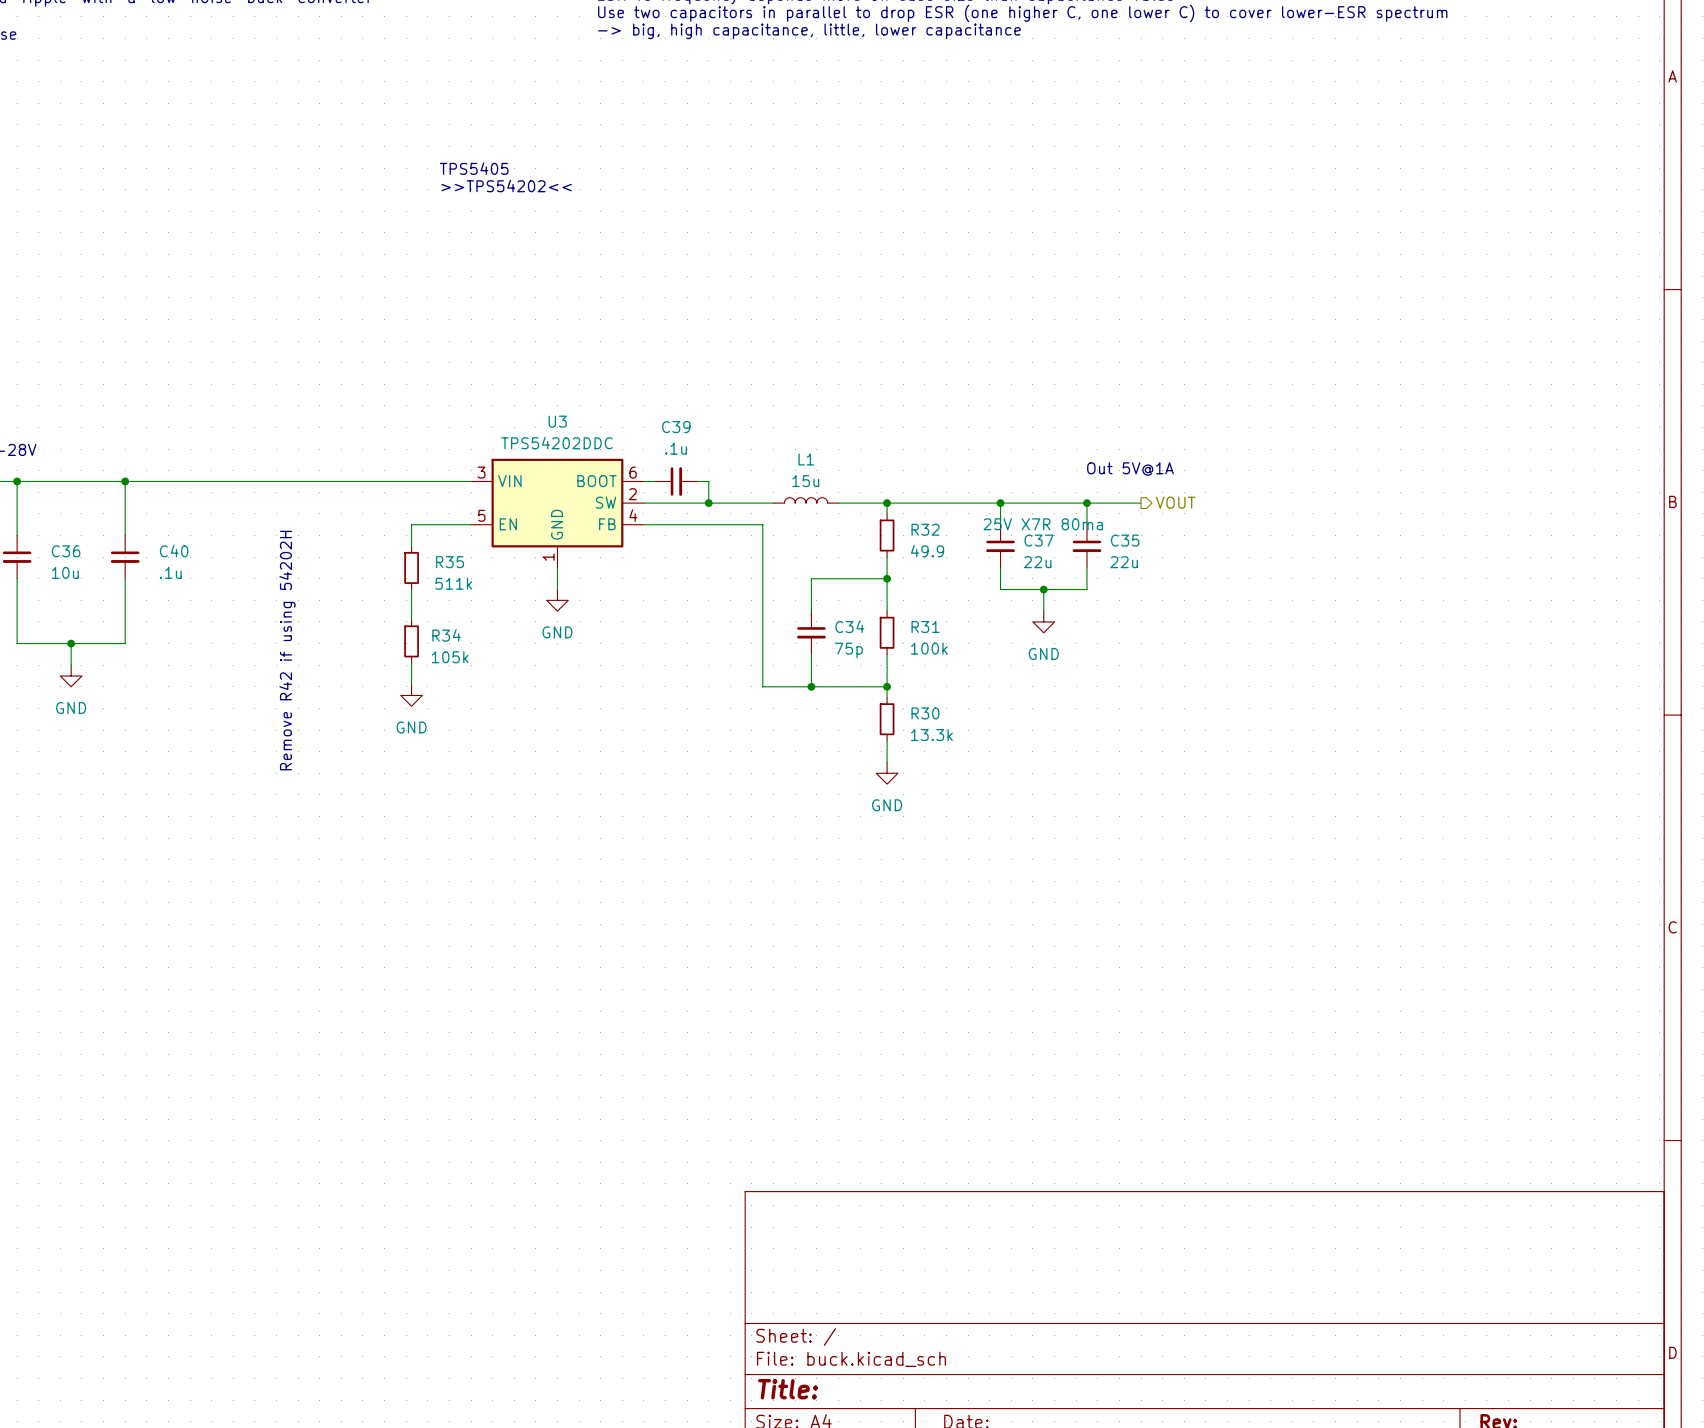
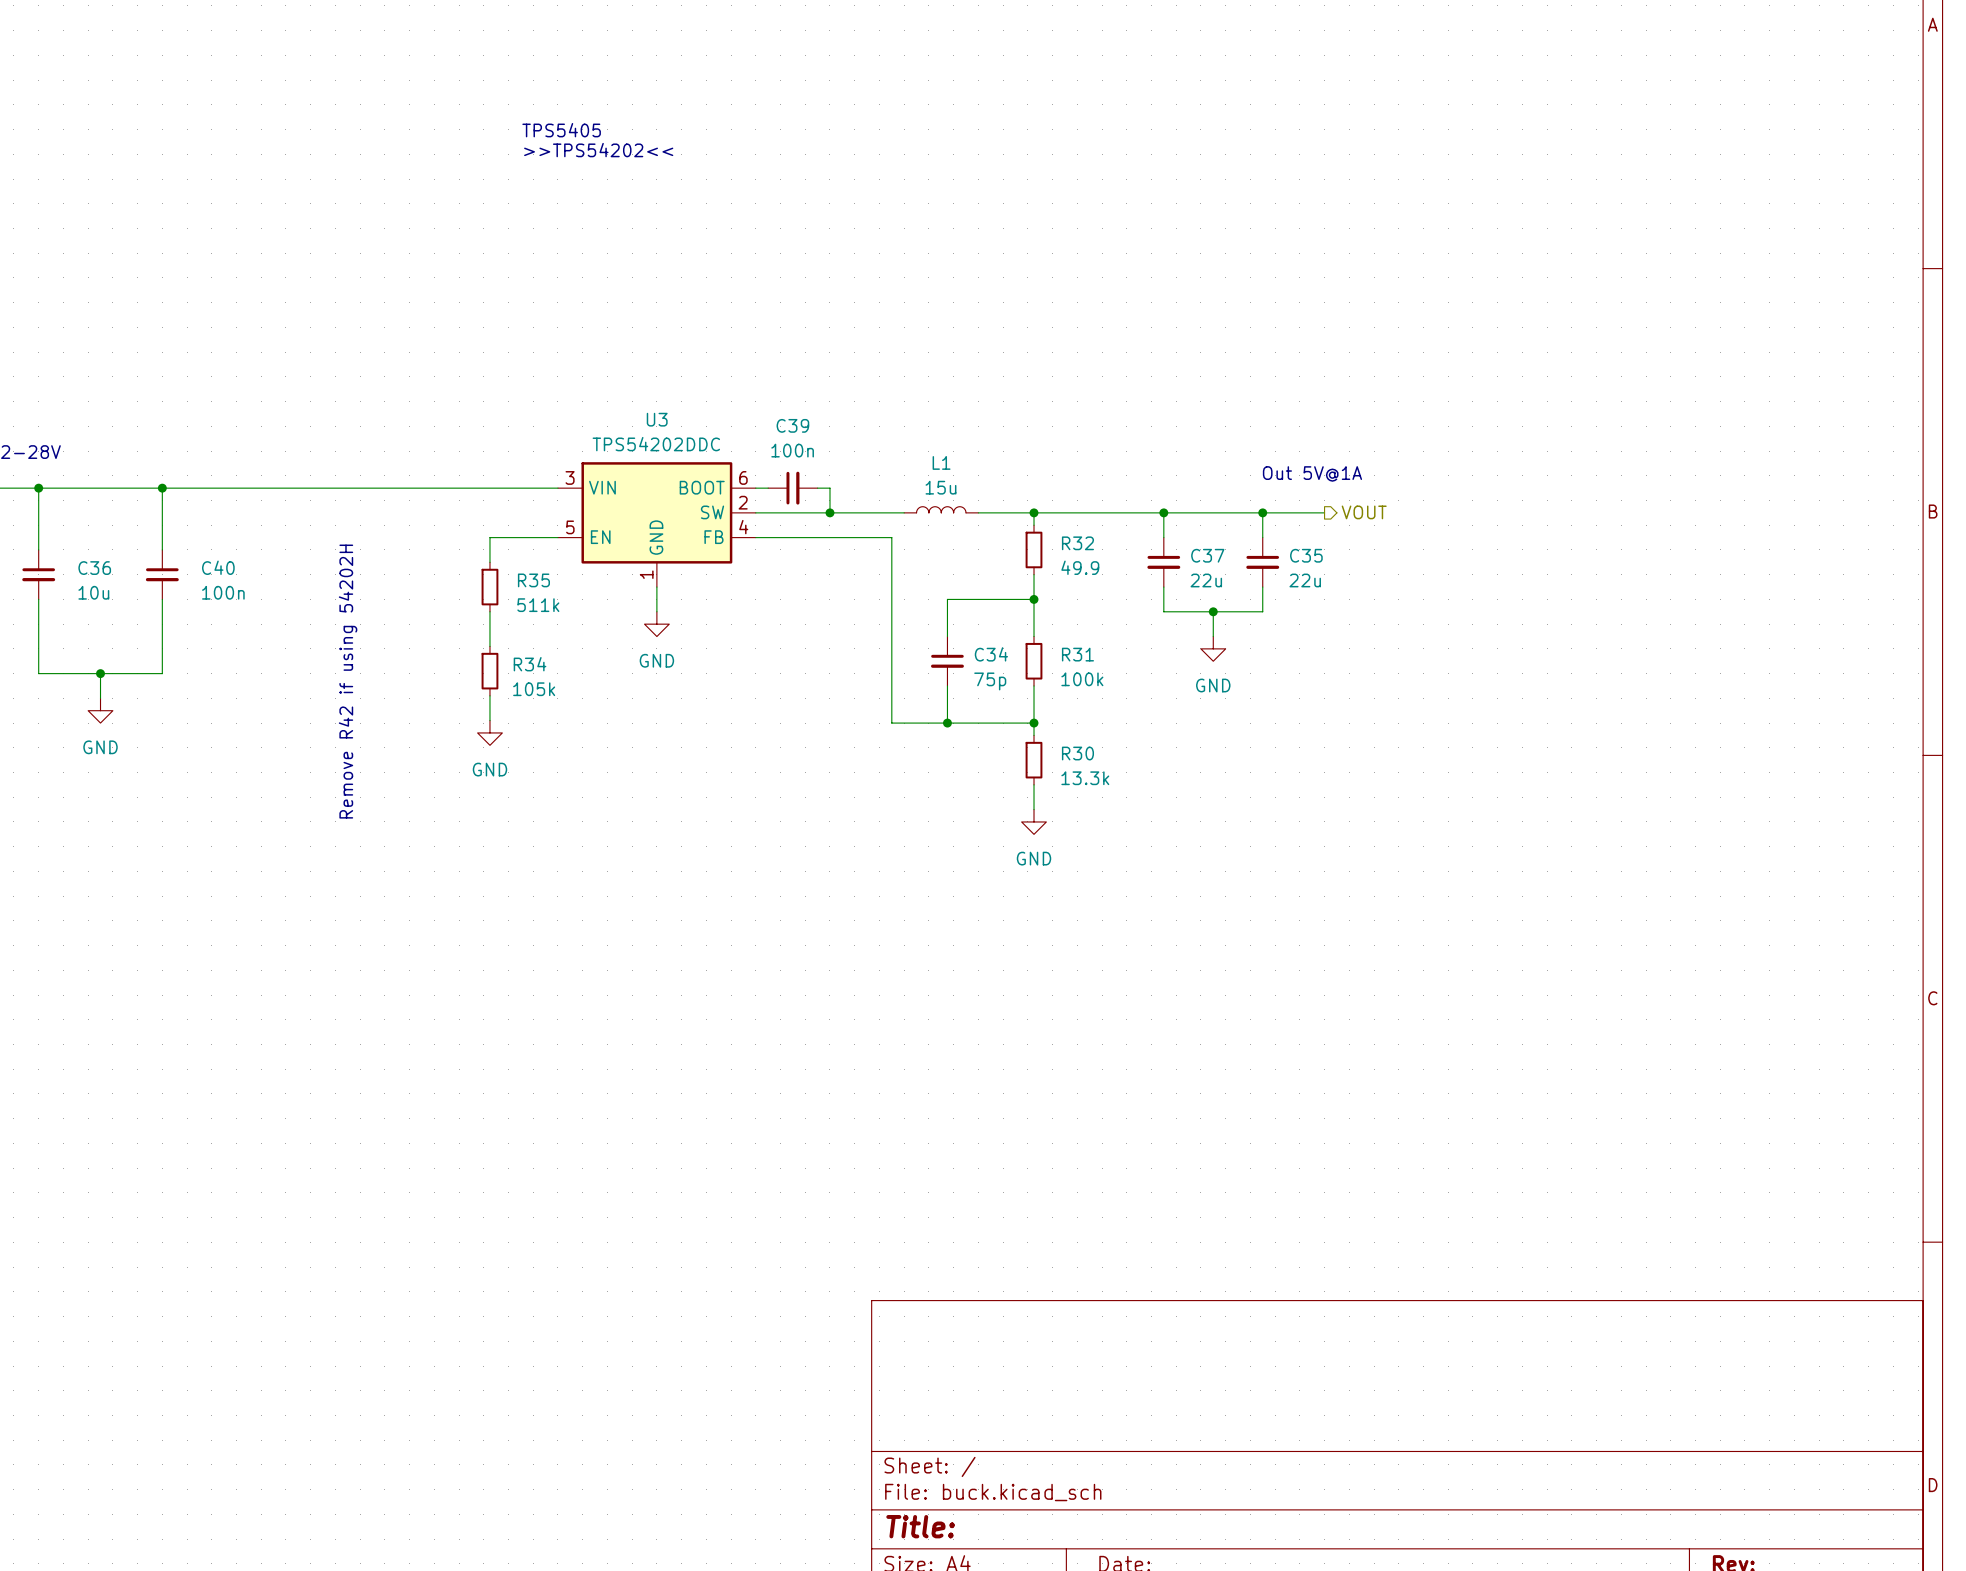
C39 value: .1u (676, 448) -> 100n (792, 450)
C35 text: 25V X7R 80ma (1043, 524) -> none
C40 value: .1u (170, 572) -> 100n (223, 592)

